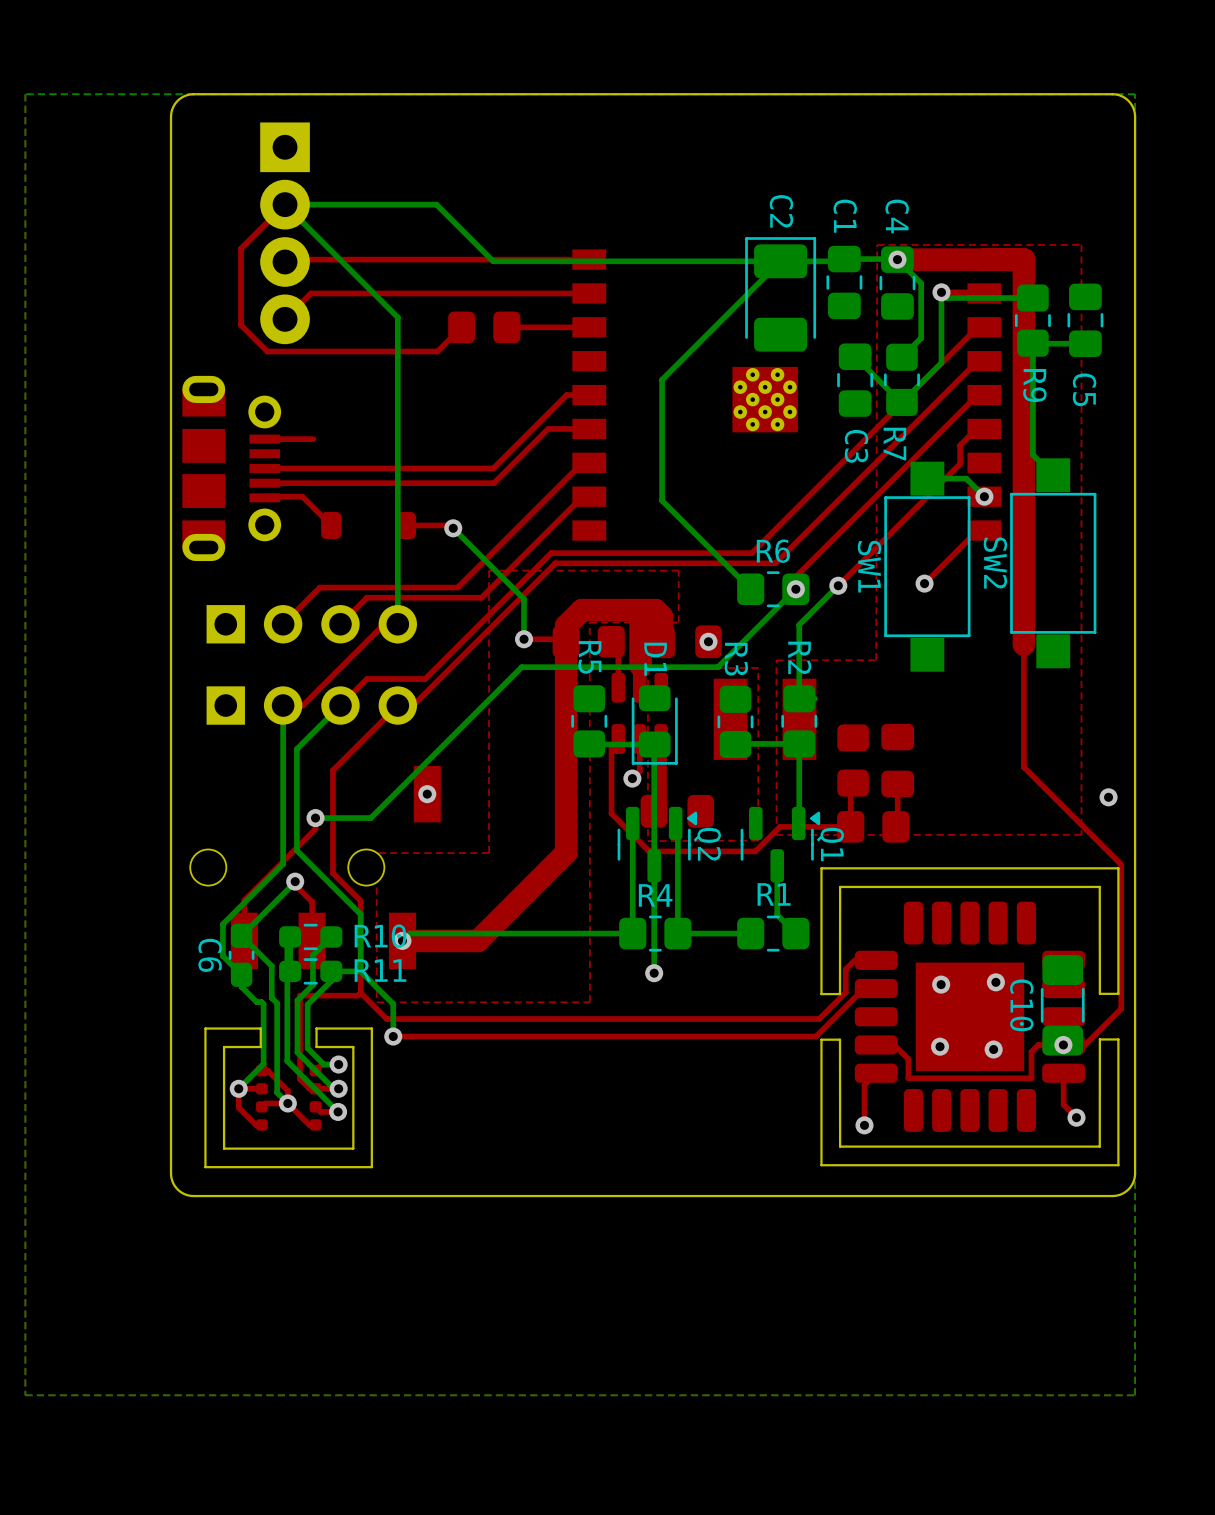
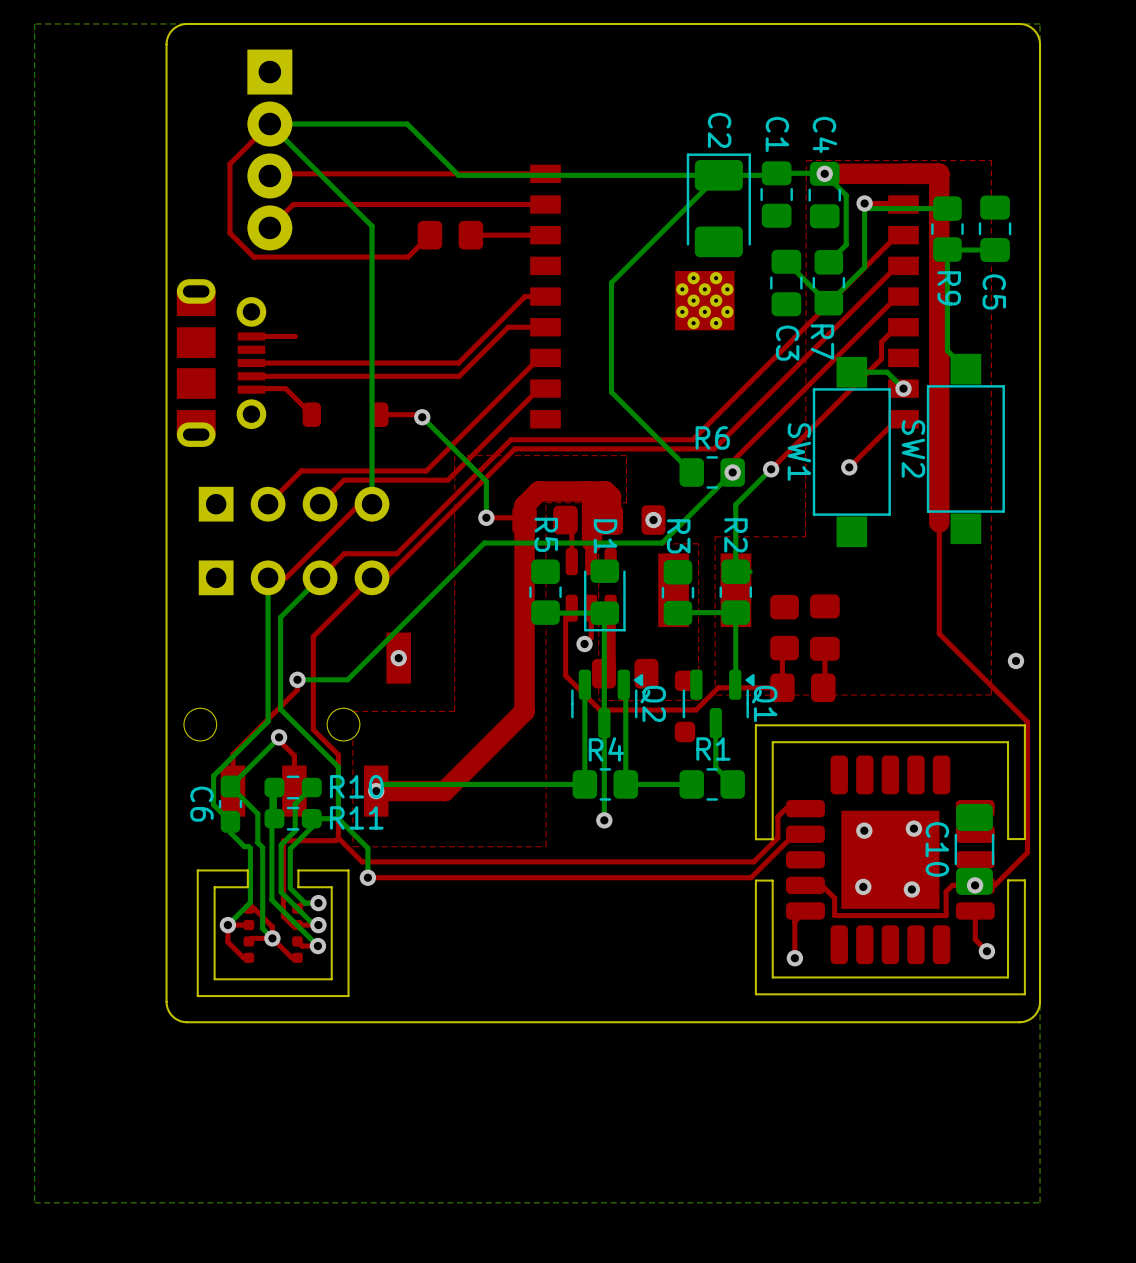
part: none -> (685, 706)

